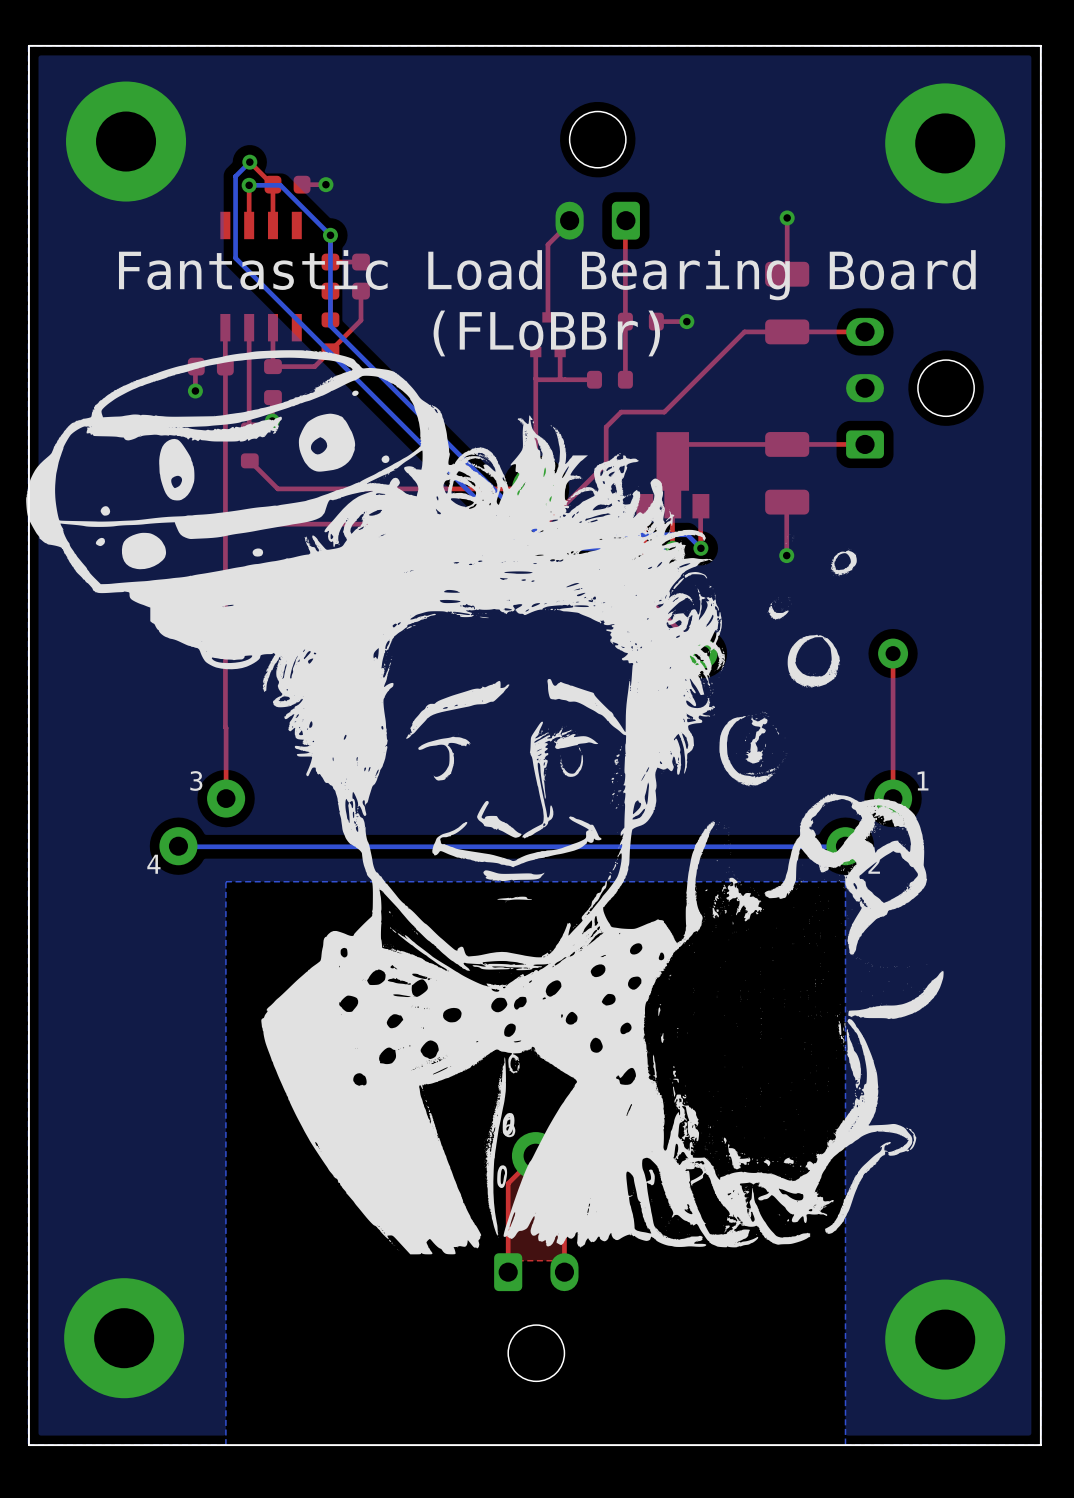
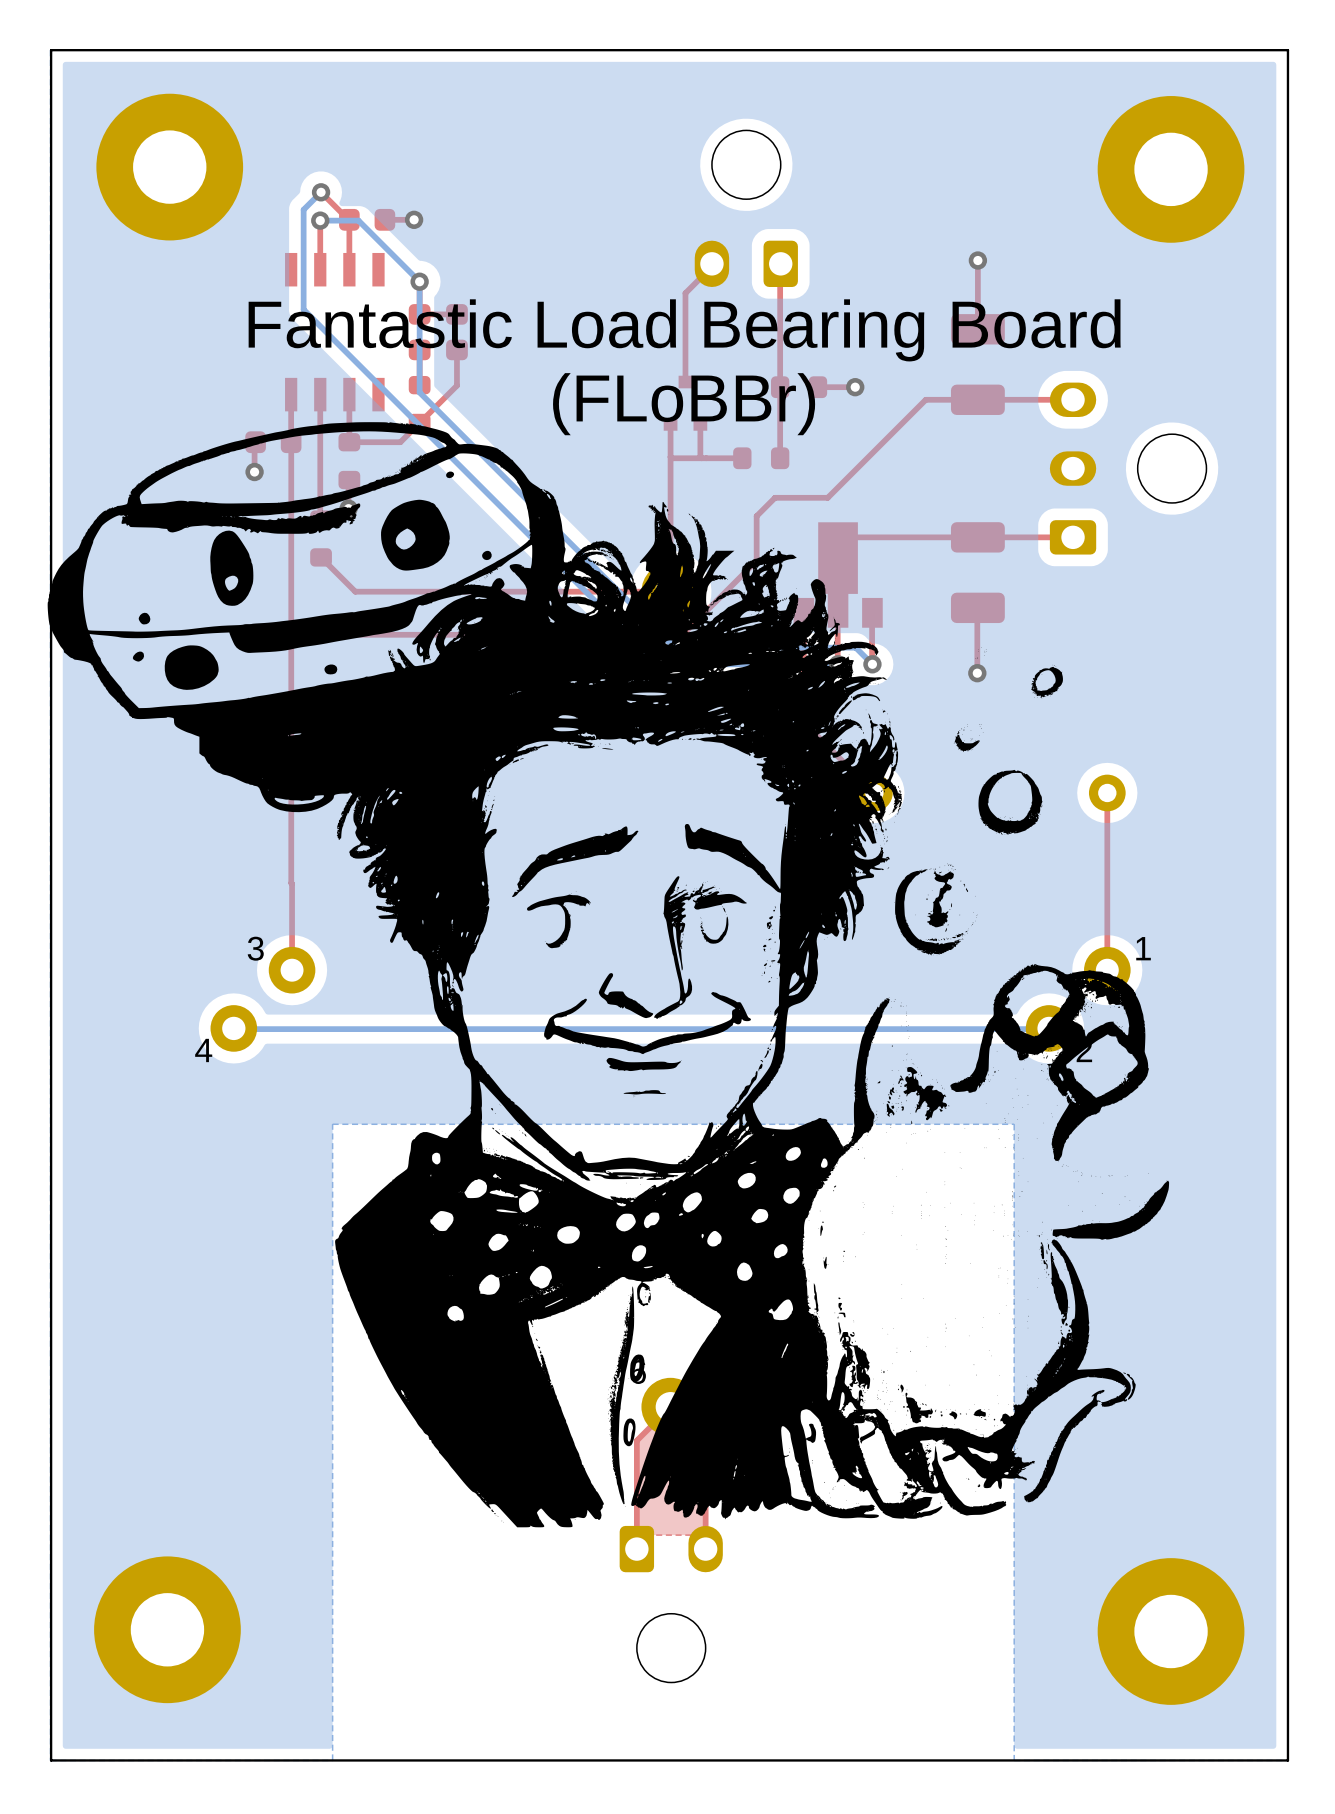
bottom zone outline: (845, 1445) (845, 881) (225, 881) (225, 1445) -> (1049, 1760) (1014, 1760) (1014, 1124) (332, 1124) (332, 1760) (291, 1760)

